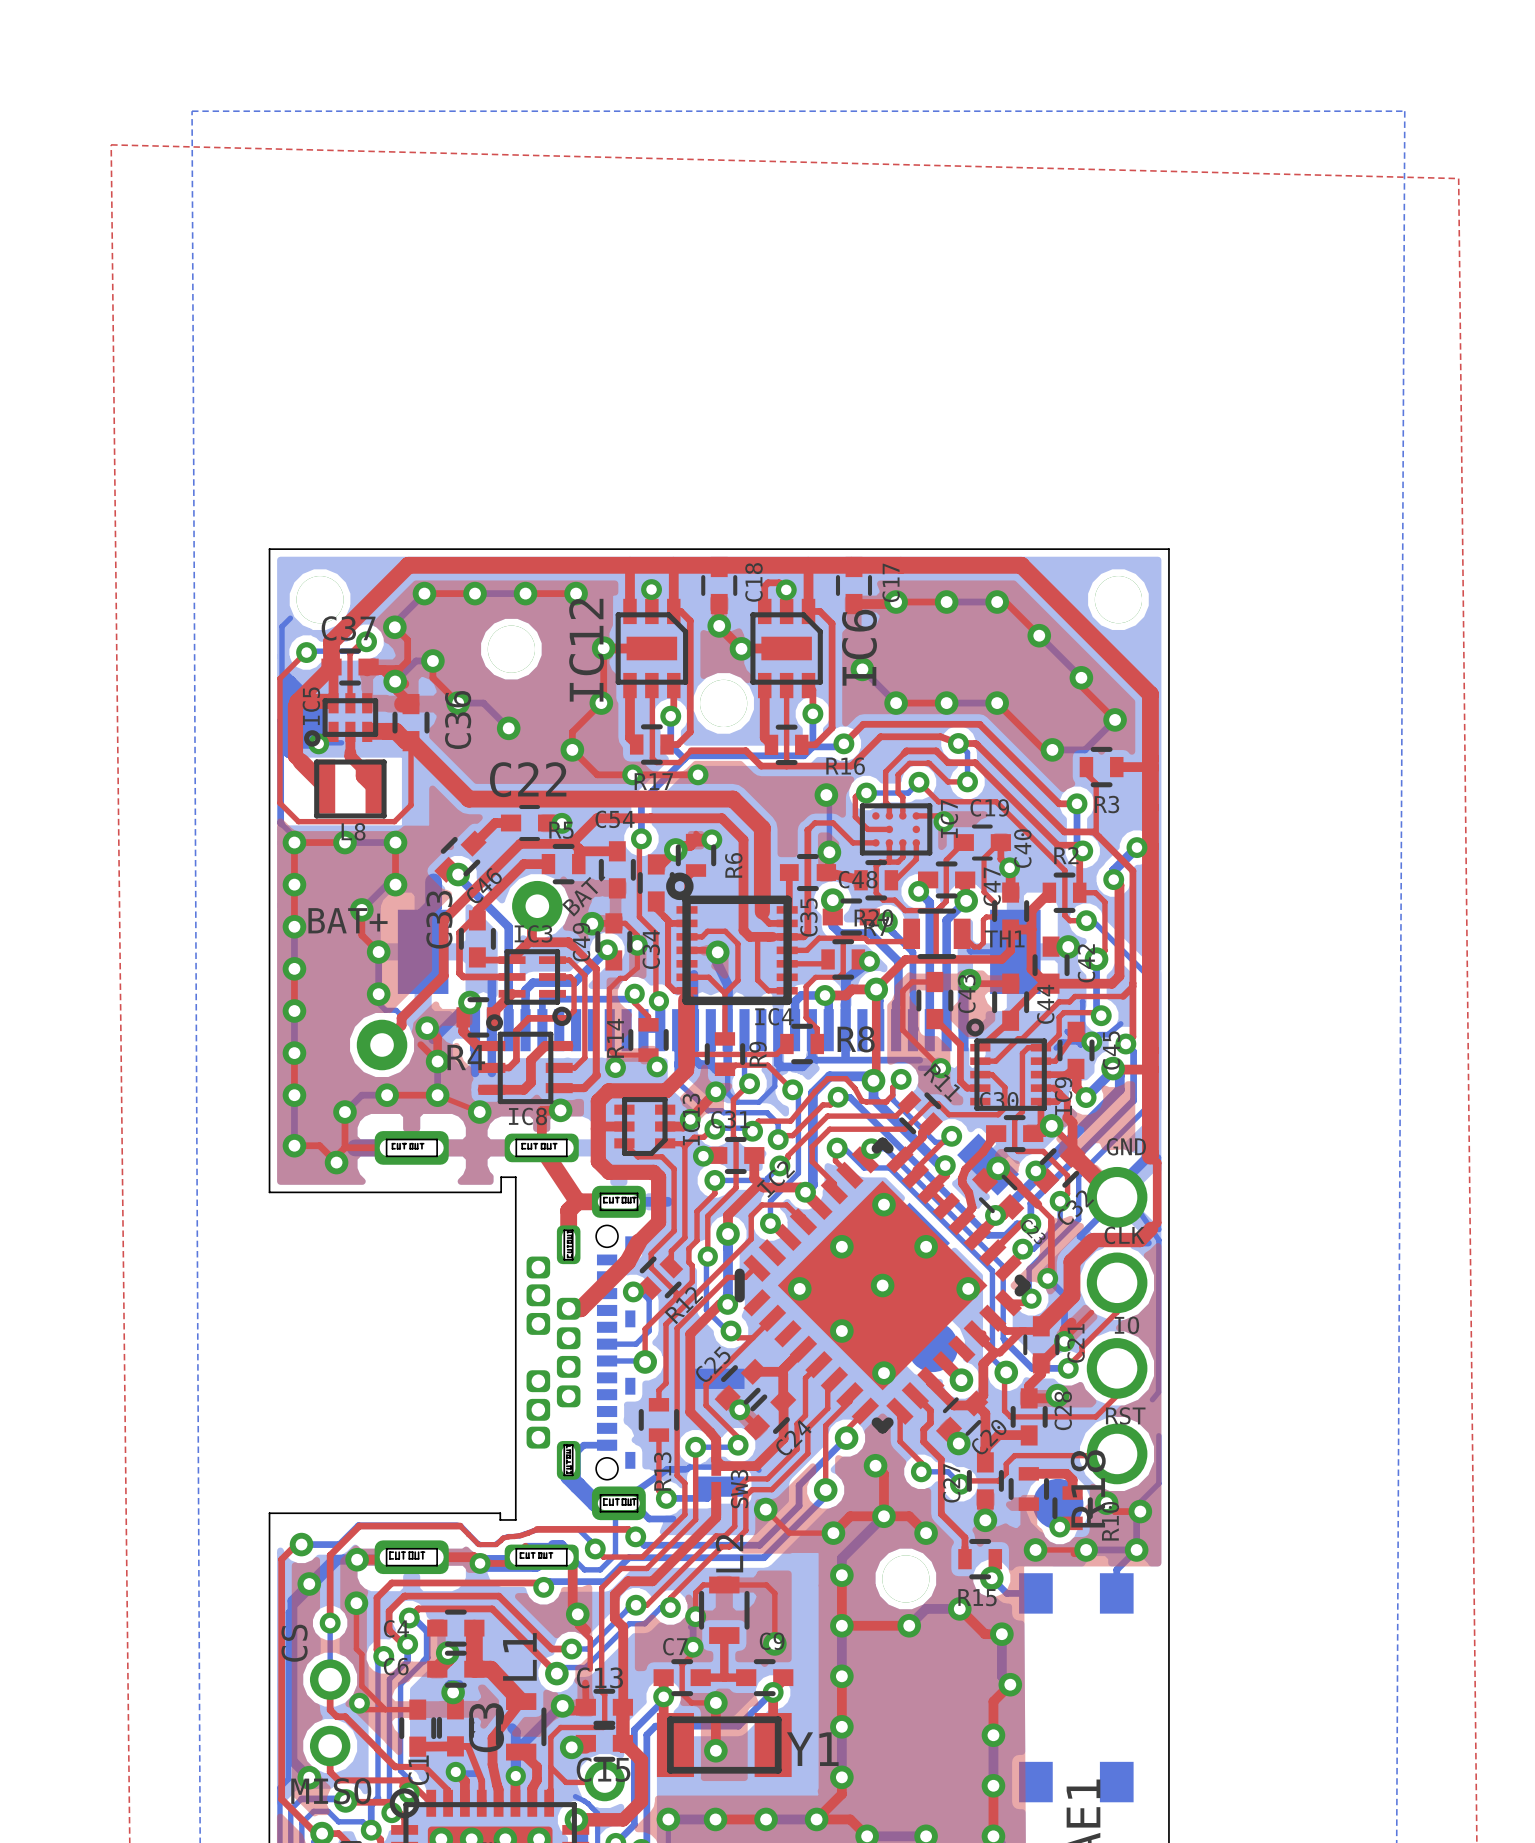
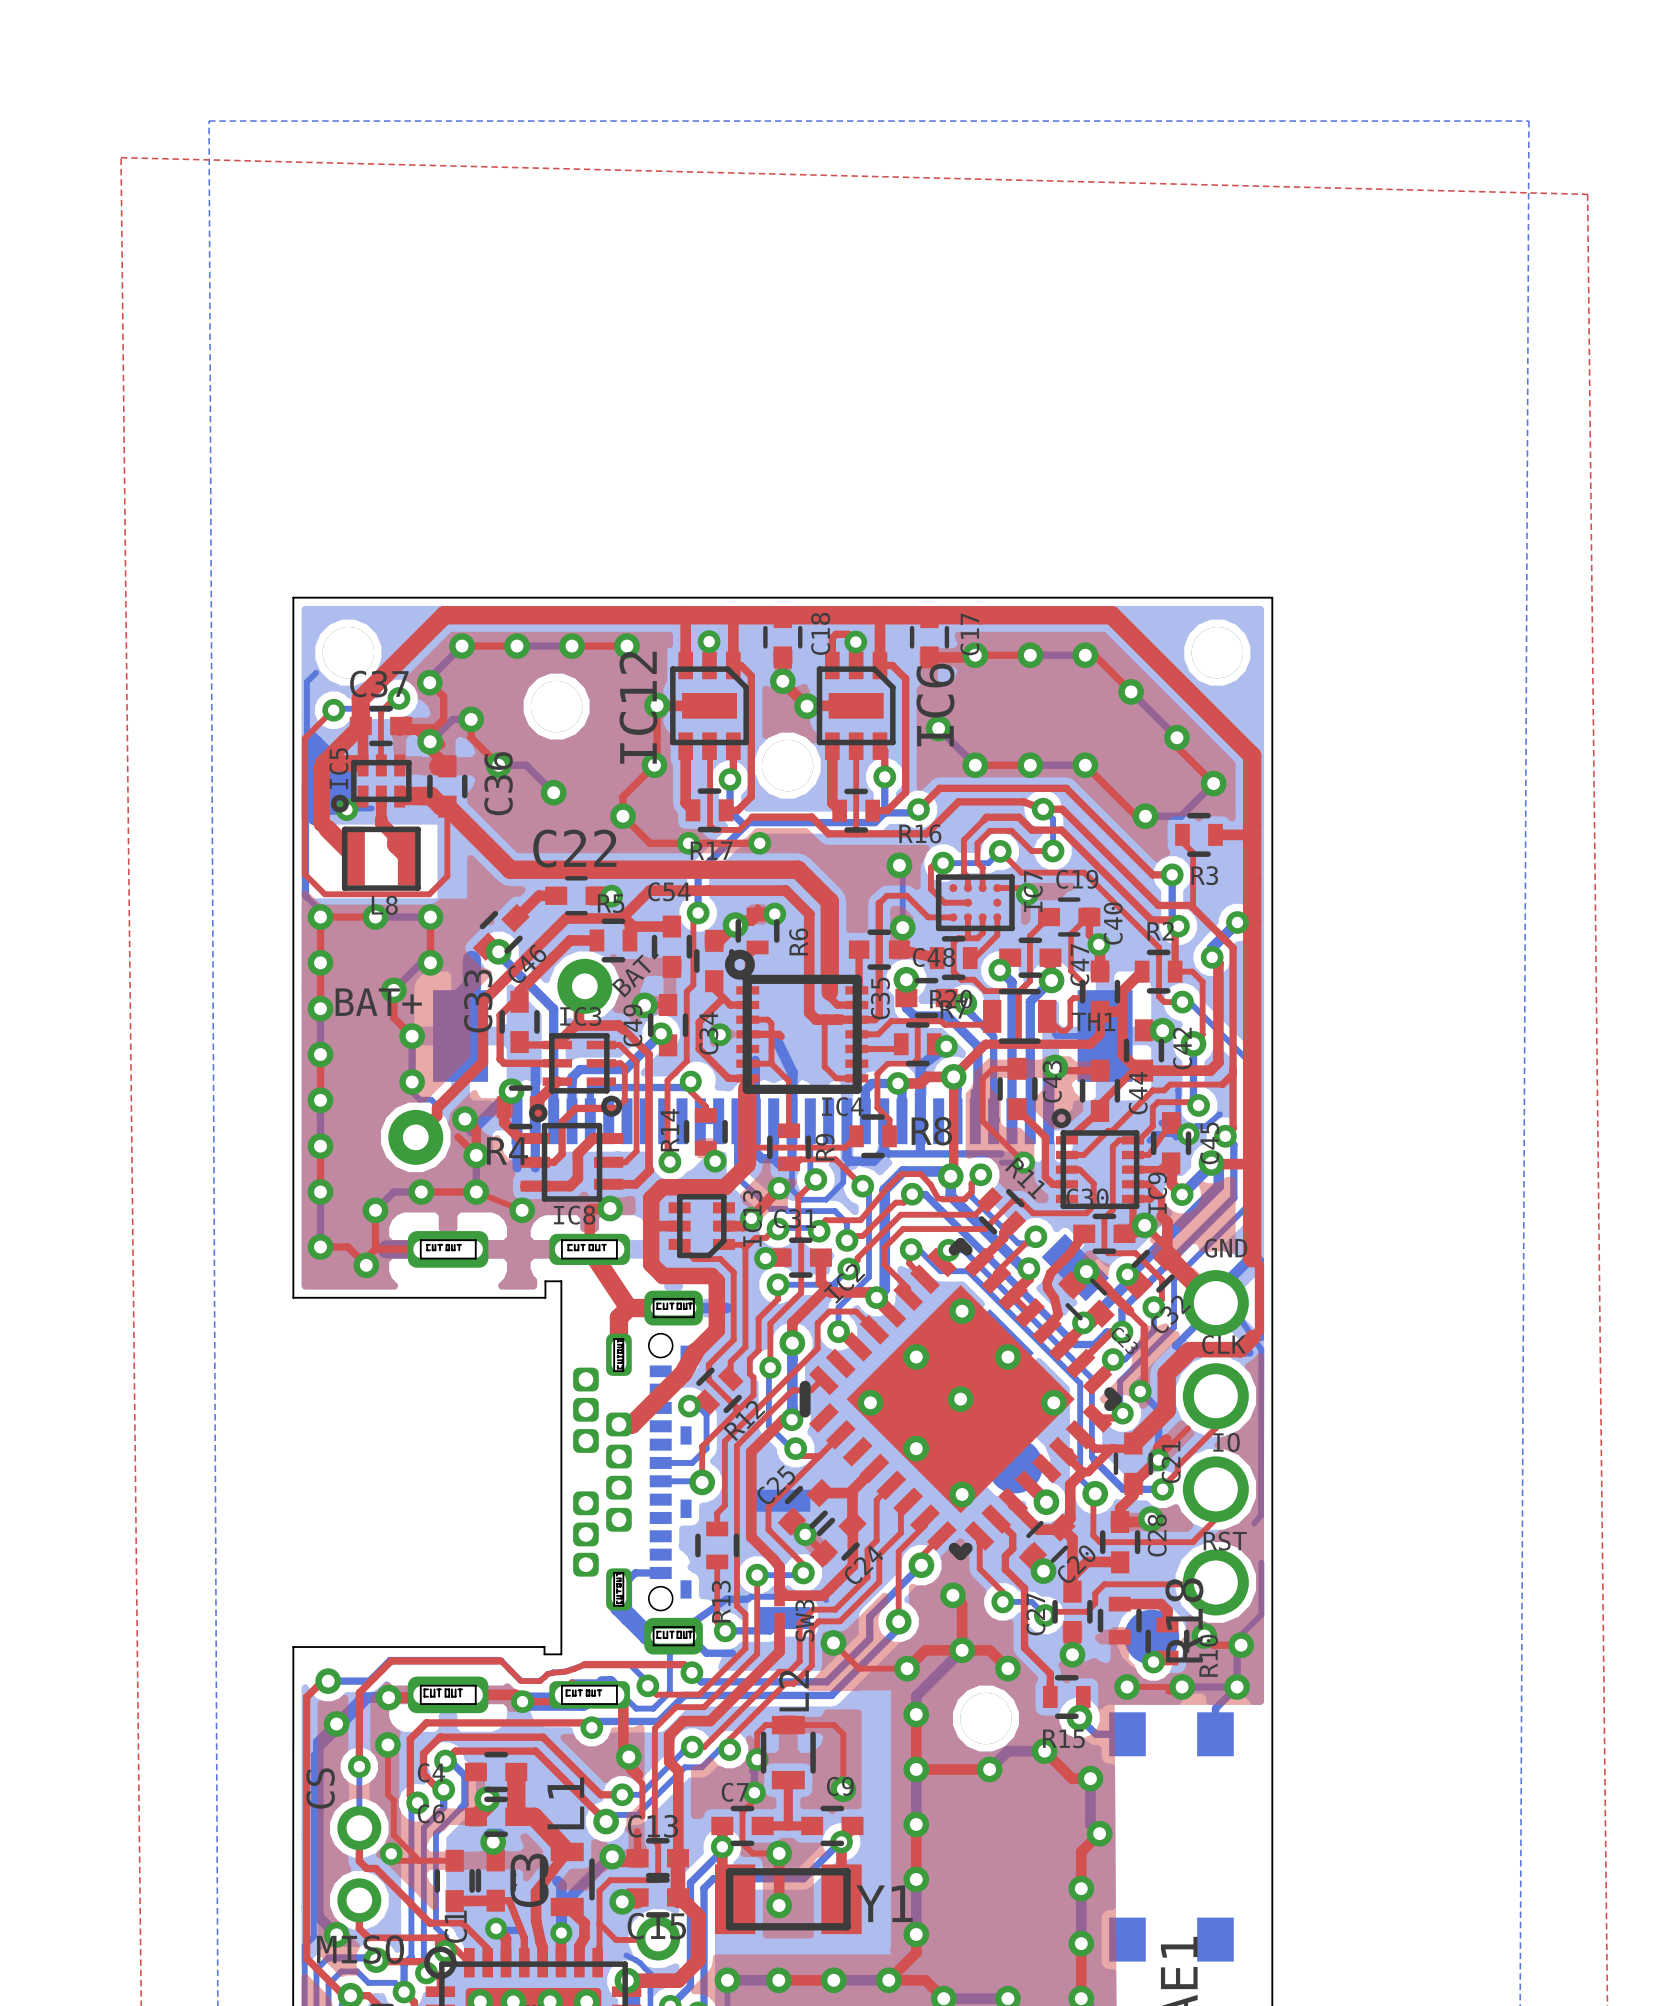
top track: (639, 840) (639, 916) (655, 933) (655, 998) (658, 1001) -> (695, 915) (693, 917) (693, 985) (686, 991) (686, 1061) (667, 1080) (667, 1159) (671, 1161)
top track: (667, 919) (668, 984) (674, 990) -> (723, 998) (699, 1022) (699, 1049) (728, 1078) (734, 1078)
top track: (613, 923) (625, 923) (637, 935) (637, 967) (625, 978) (620, 978) (609, 989) (609, 1049) (614, 1055) (648, 1055) -> none
top track: (702, 936) (707, 931) (725, 931) (737, 943) (737, 980) (724, 993) -> (764, 1019) (767, 1019) (771, 1023) (771, 1063)
via position: (637, 945) -> (720, 1034)
via: (717, 952) -> none
via: (658, 1001) -> none

